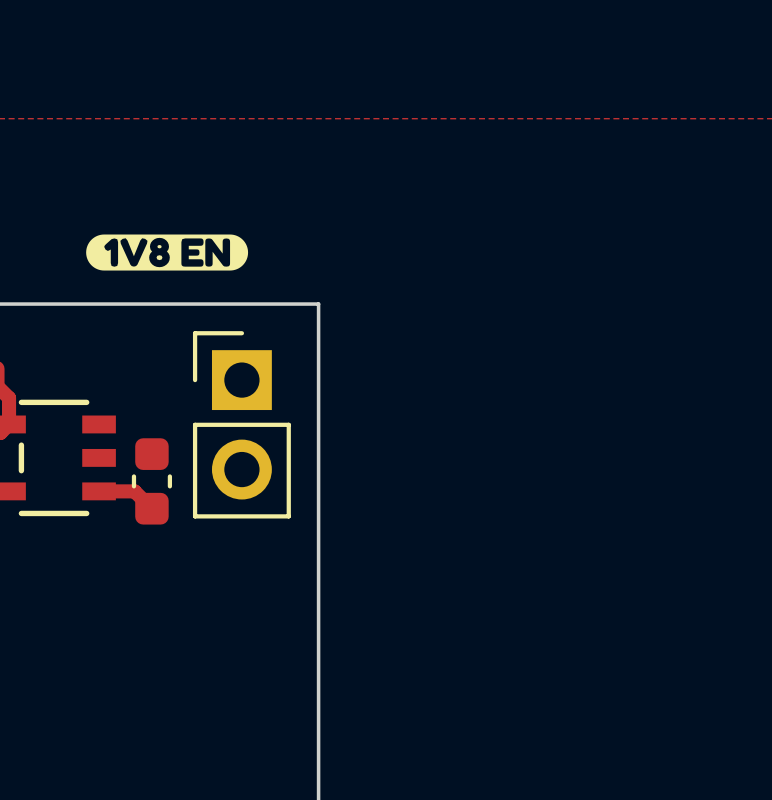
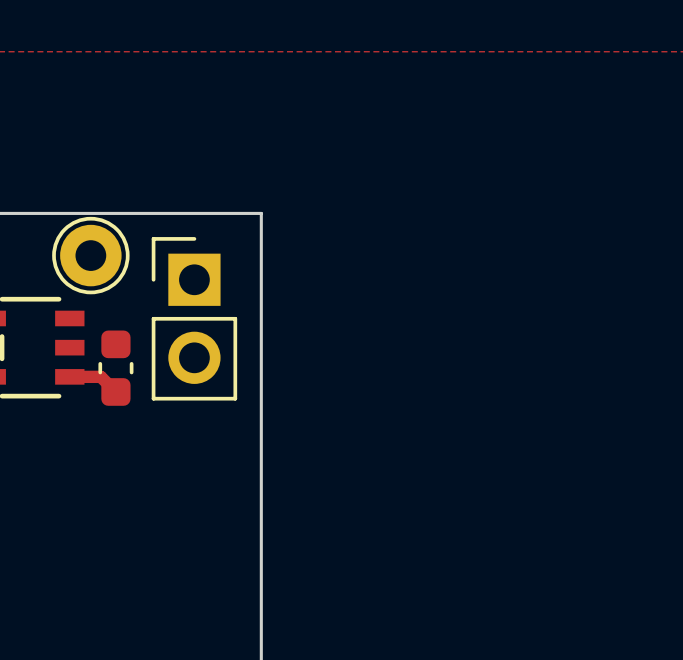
drawing: [86, 234, 249, 271] -> none
part: none -> (90, 255)

